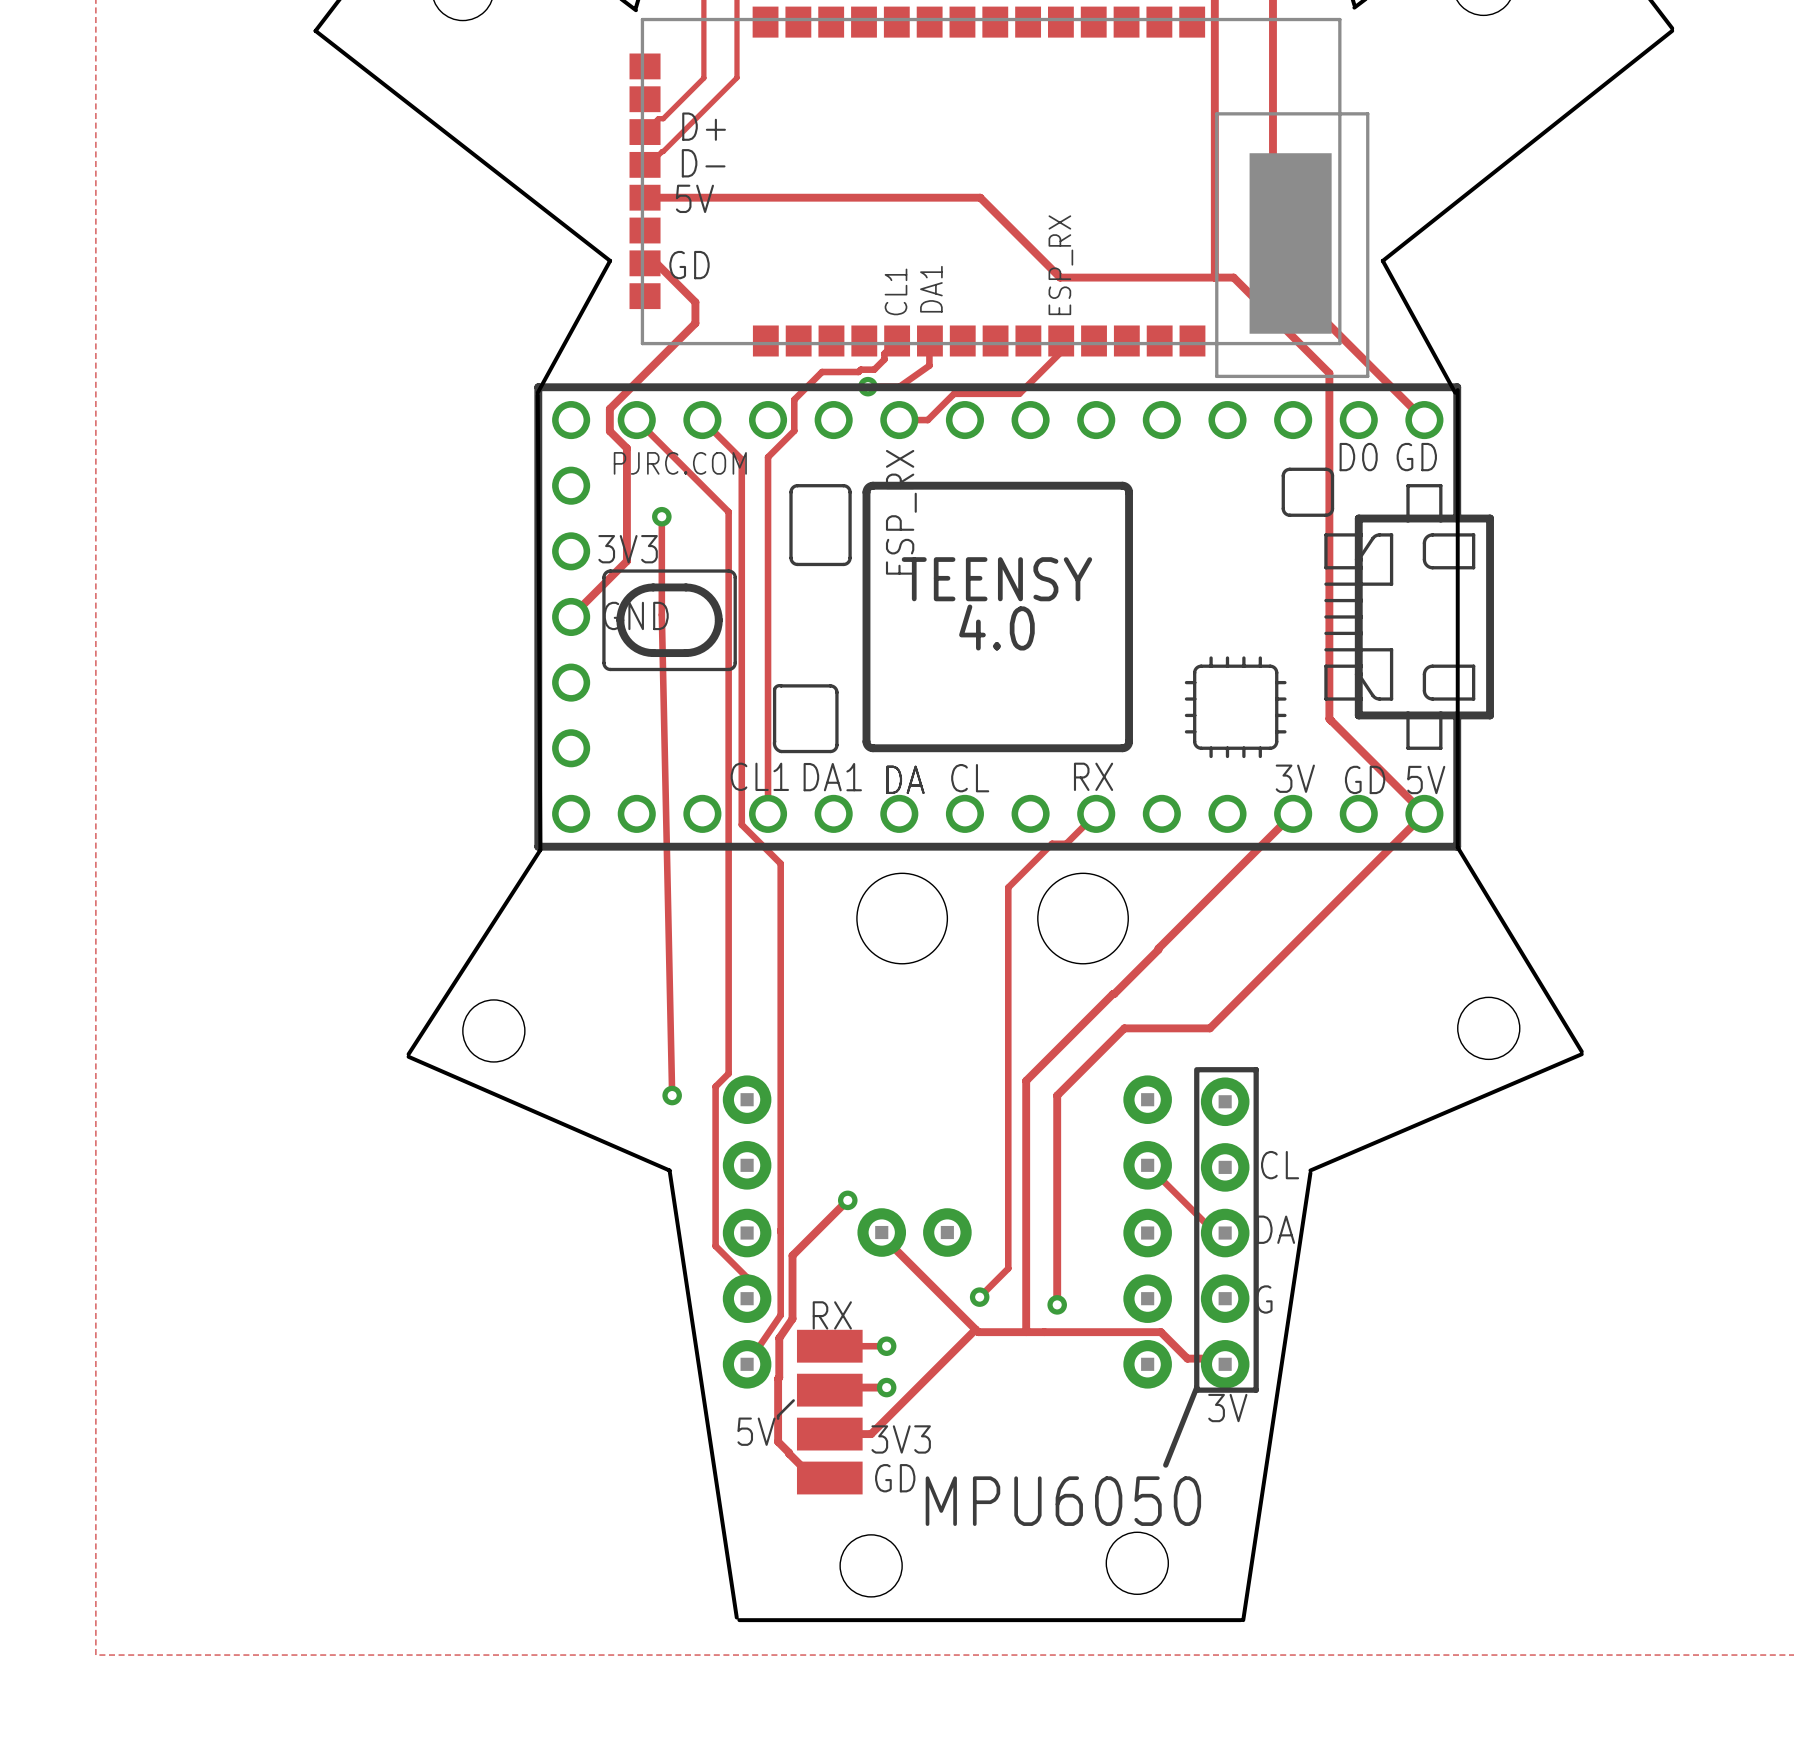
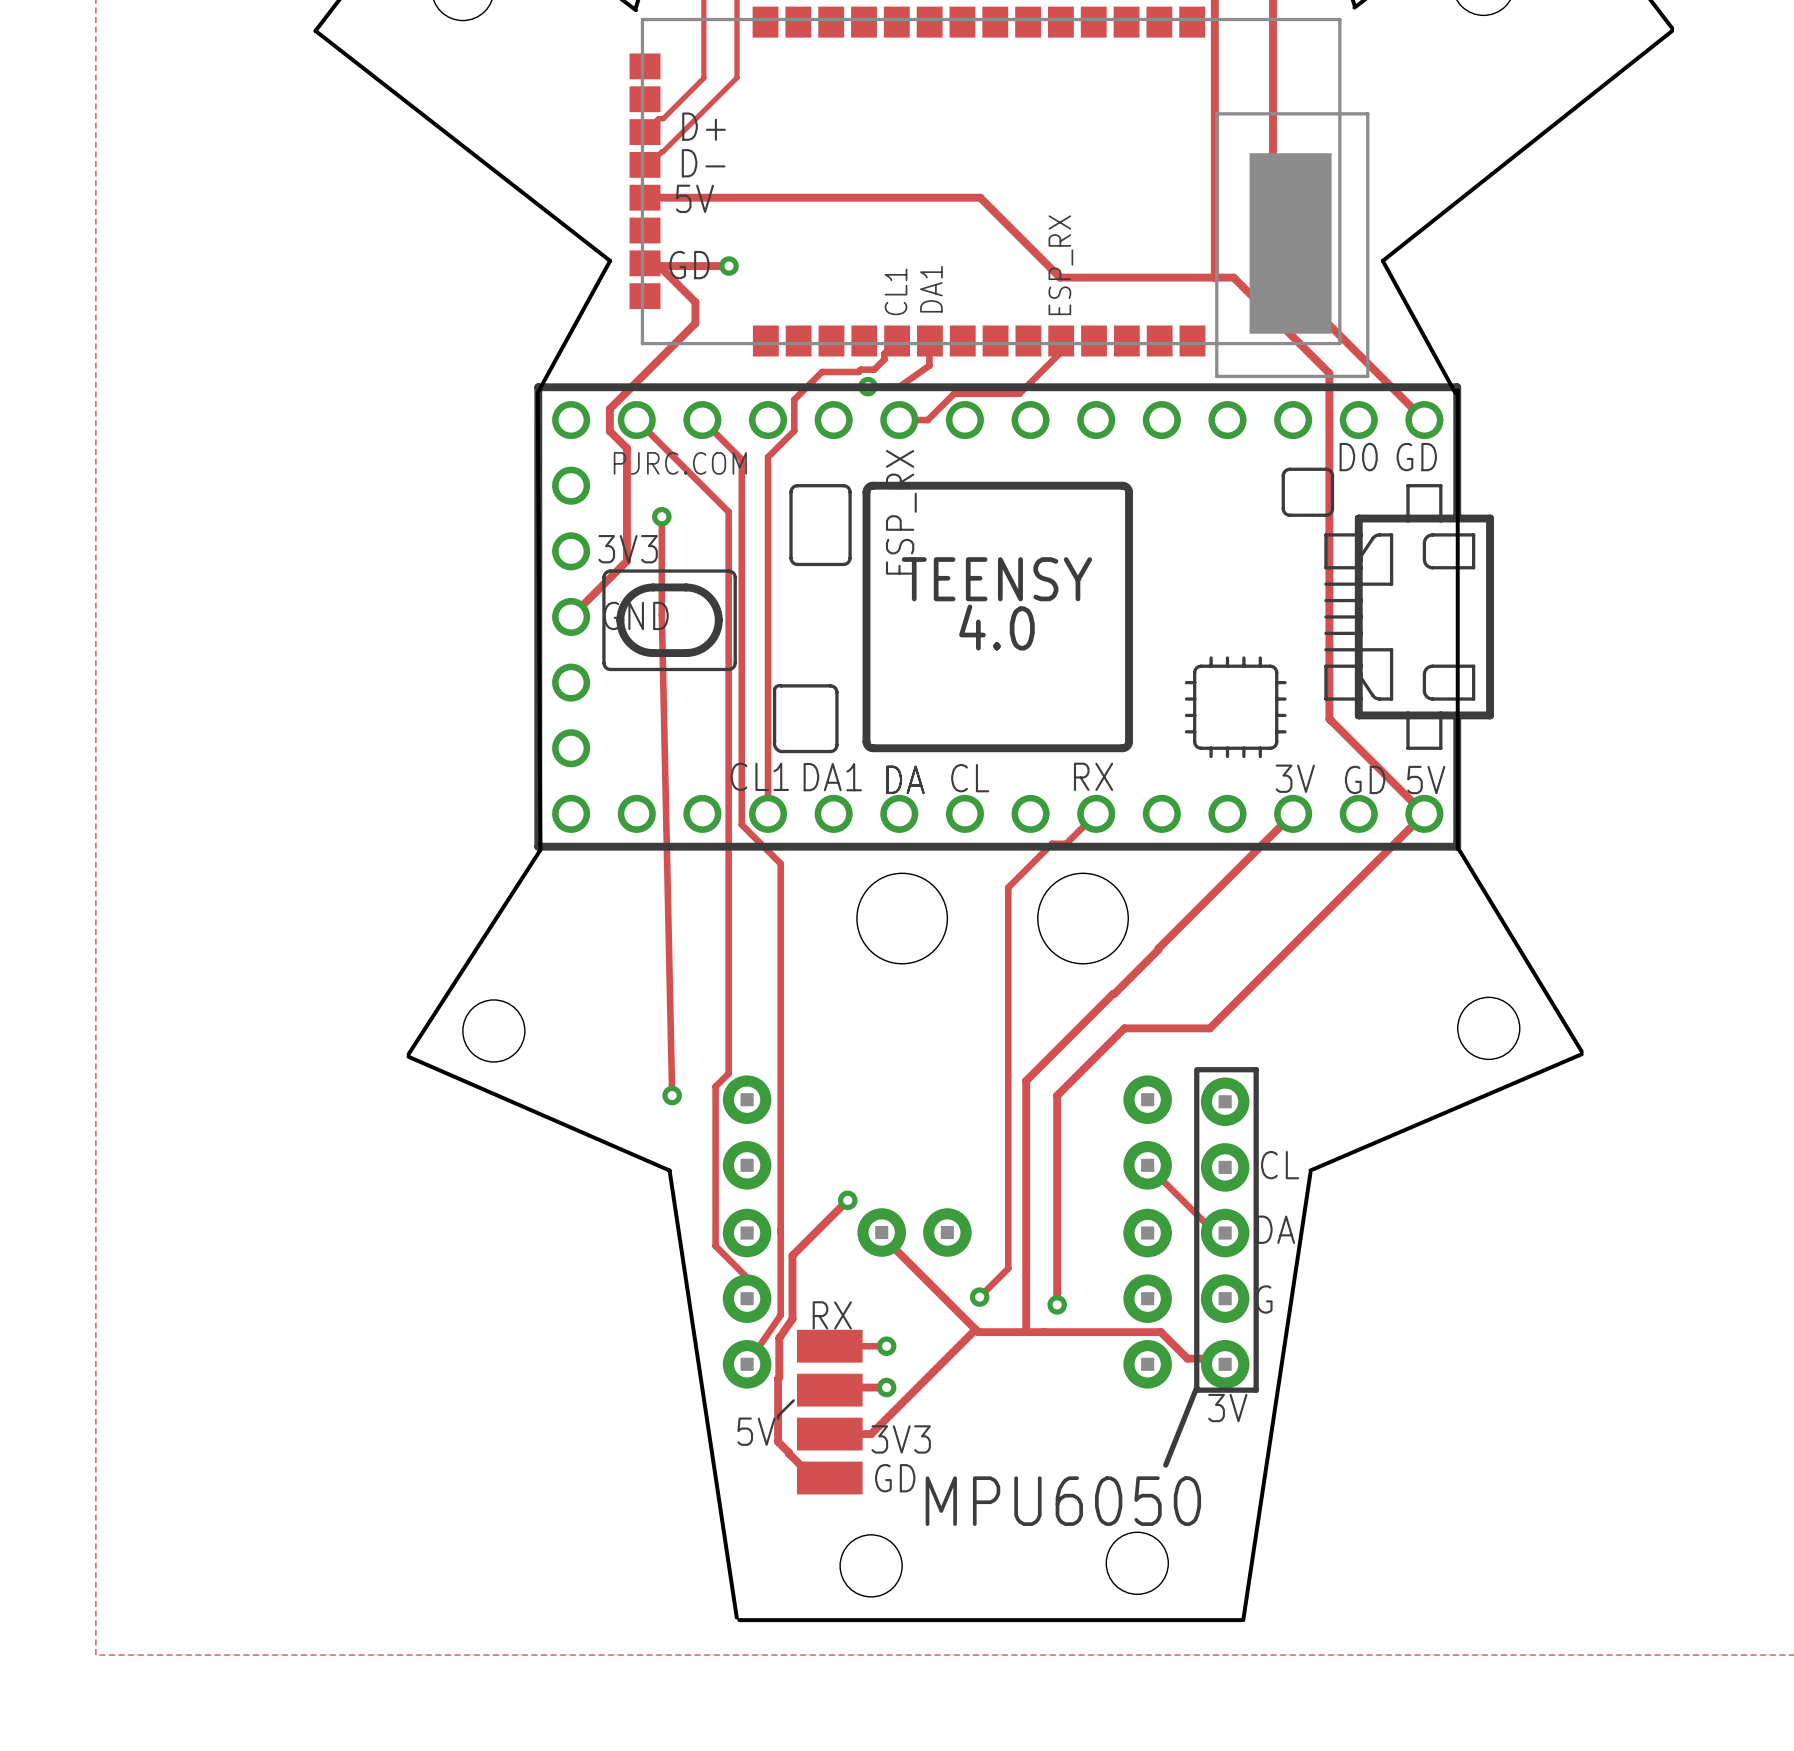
track: none -> (659, 266) (729, 266)
via: none -> (729, 266)

